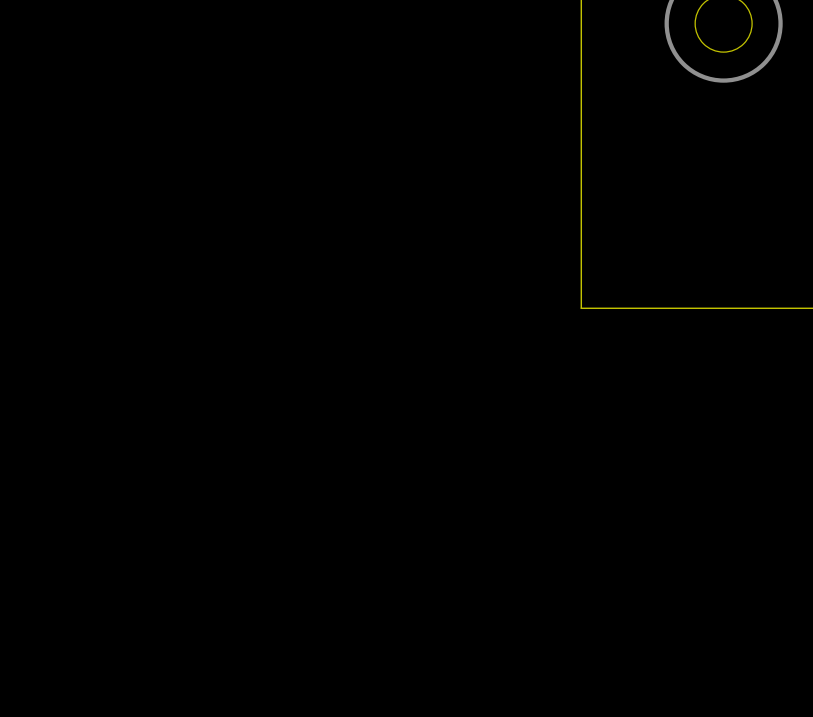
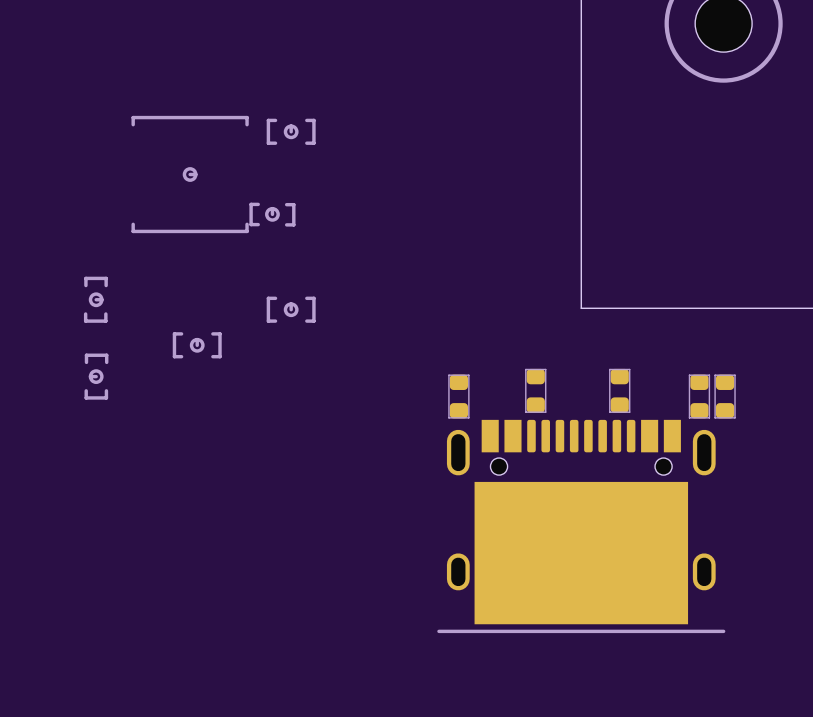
drawing: none -> [131, 115, 316, 234]
drawing: none -> [83, 276, 109, 400]
drawing: none -> [266, 296, 316, 323]
drawing: none -> [172, 332, 222, 359]
part: none -> (535, 390)
part: none -> (619, 390)
part: none -> (458, 396)
part: none -> (699, 396)
part: none -> (725, 396)
part: none -> (581, 526)

